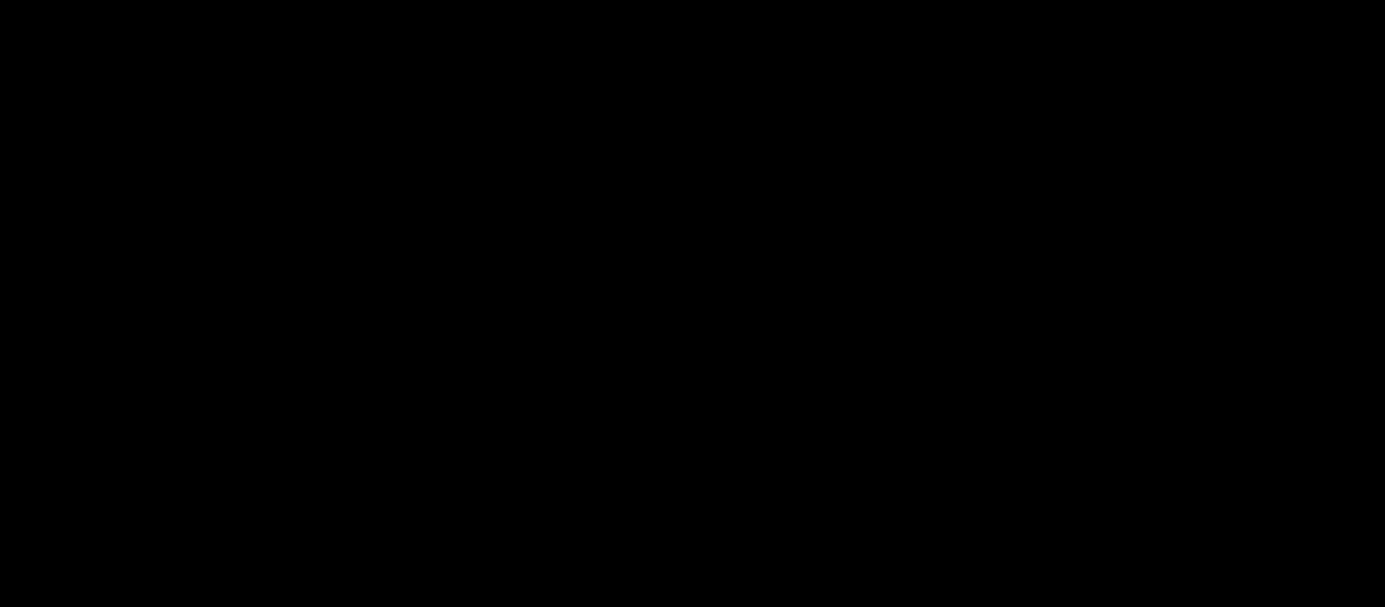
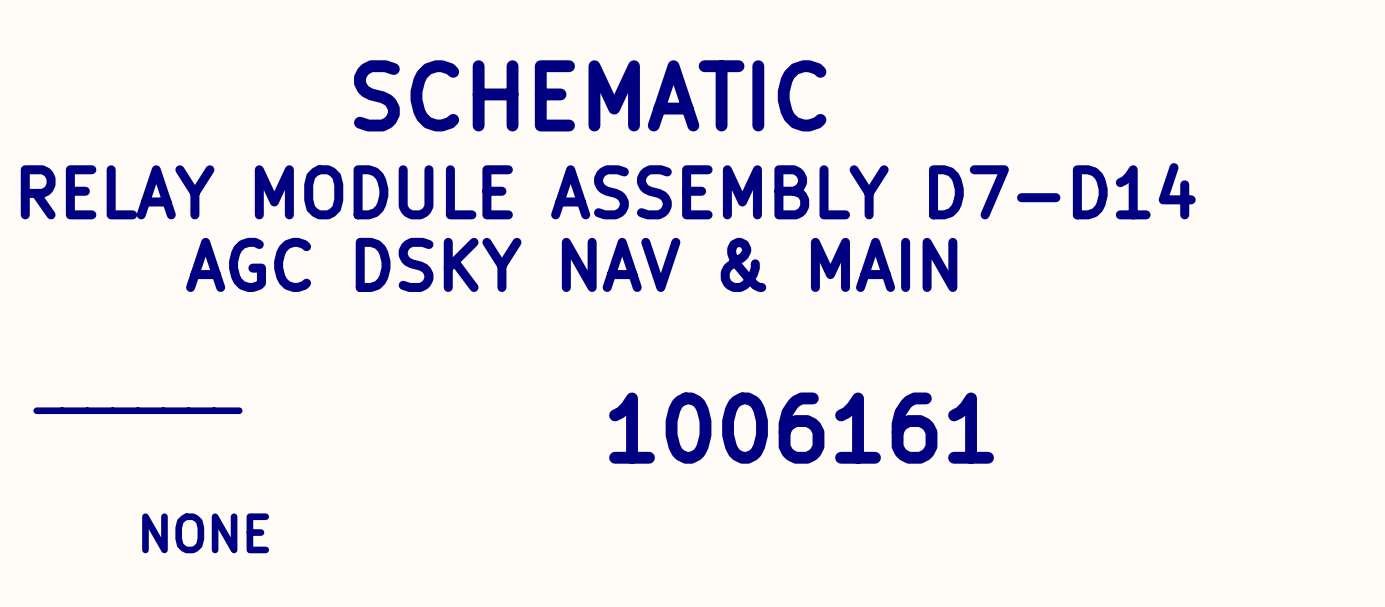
text: none -> SCHEMATIC (590, 95)
text: none -> RELAY MODULE ASSEMBLY D7-D14 (608, 191)
text: none -> AGC DSKY NAV & MAIN (571, 264)
text: none -> ________ (137, 410)
text: none -> 1006161 (801, 428)
text: none -> NONE (205, 533)

